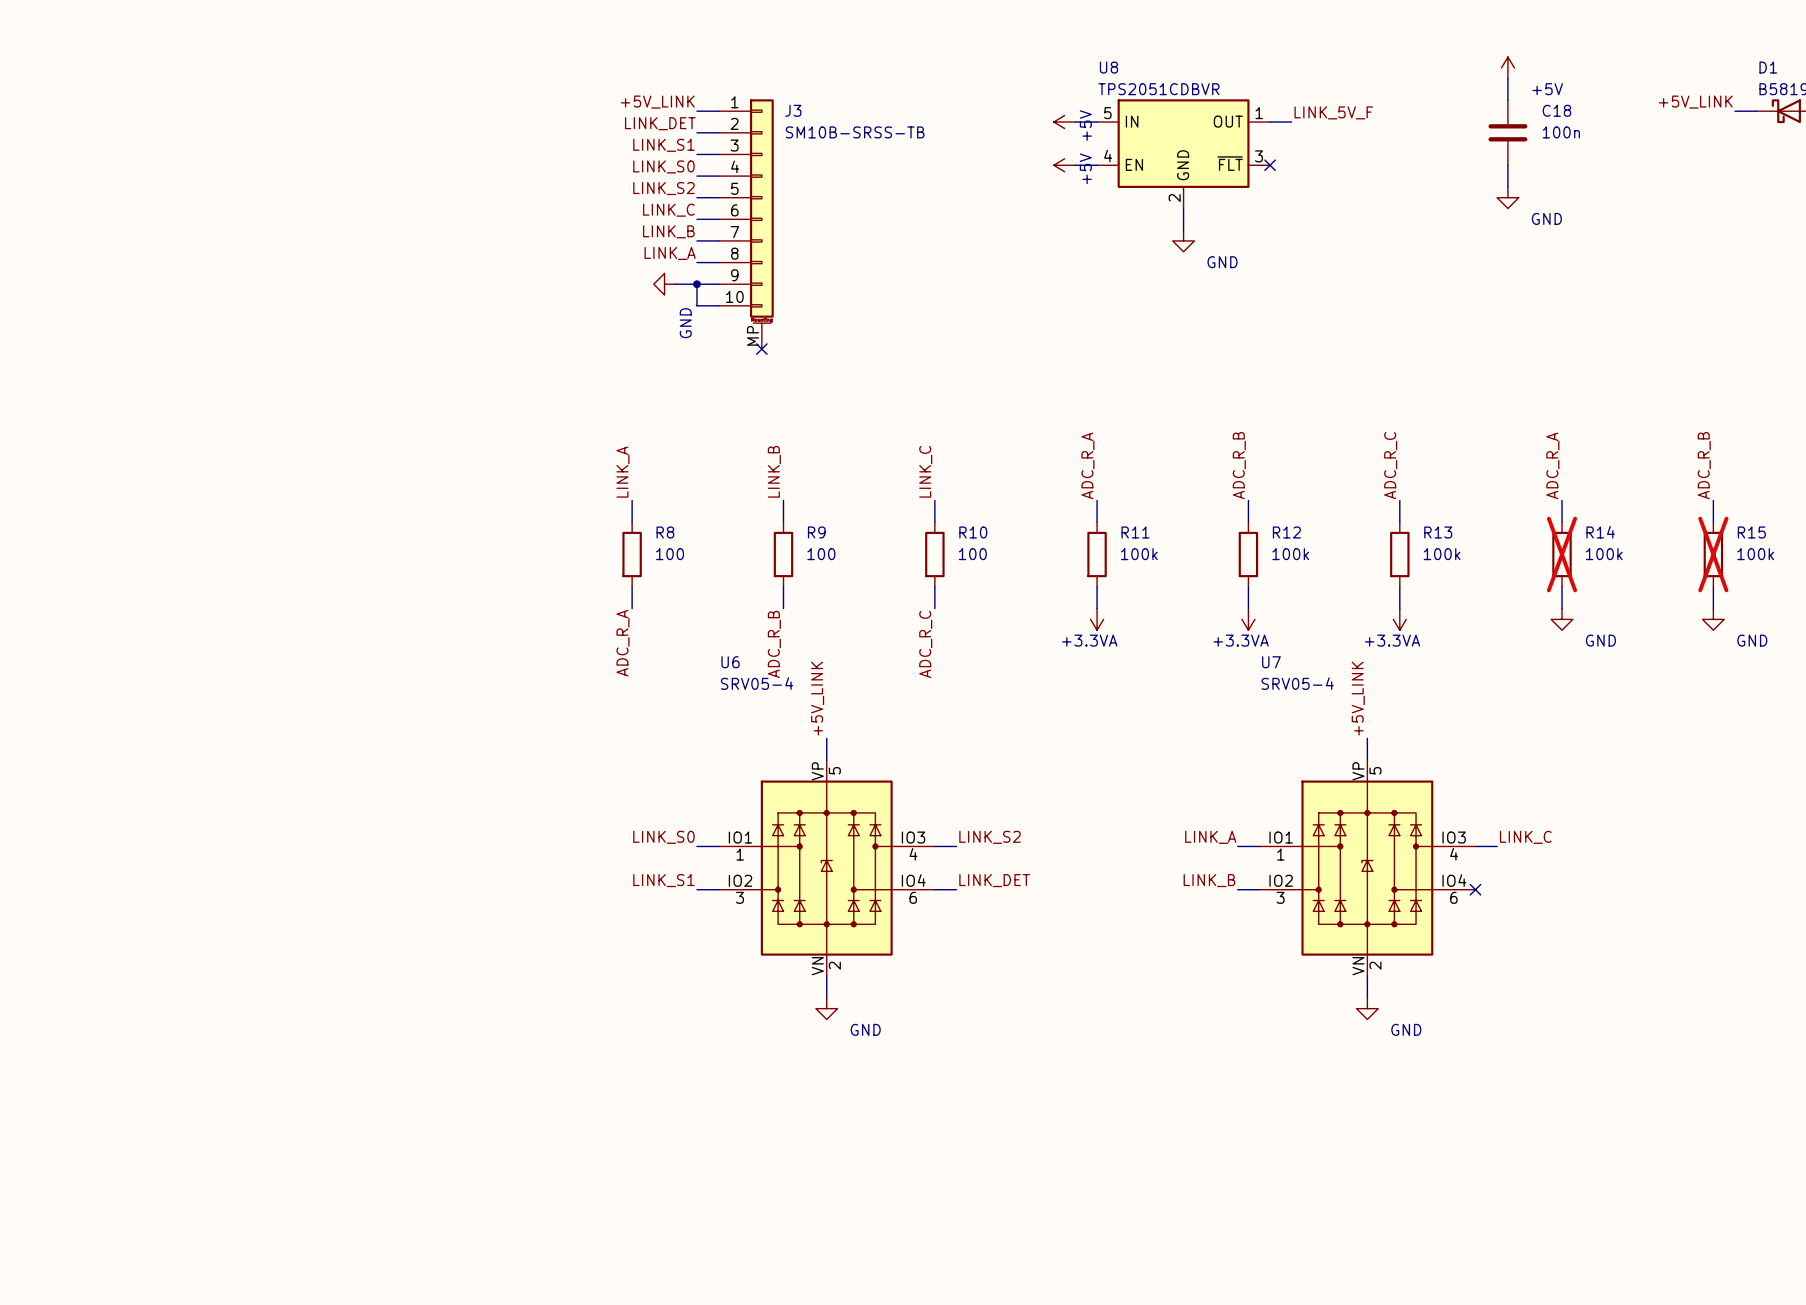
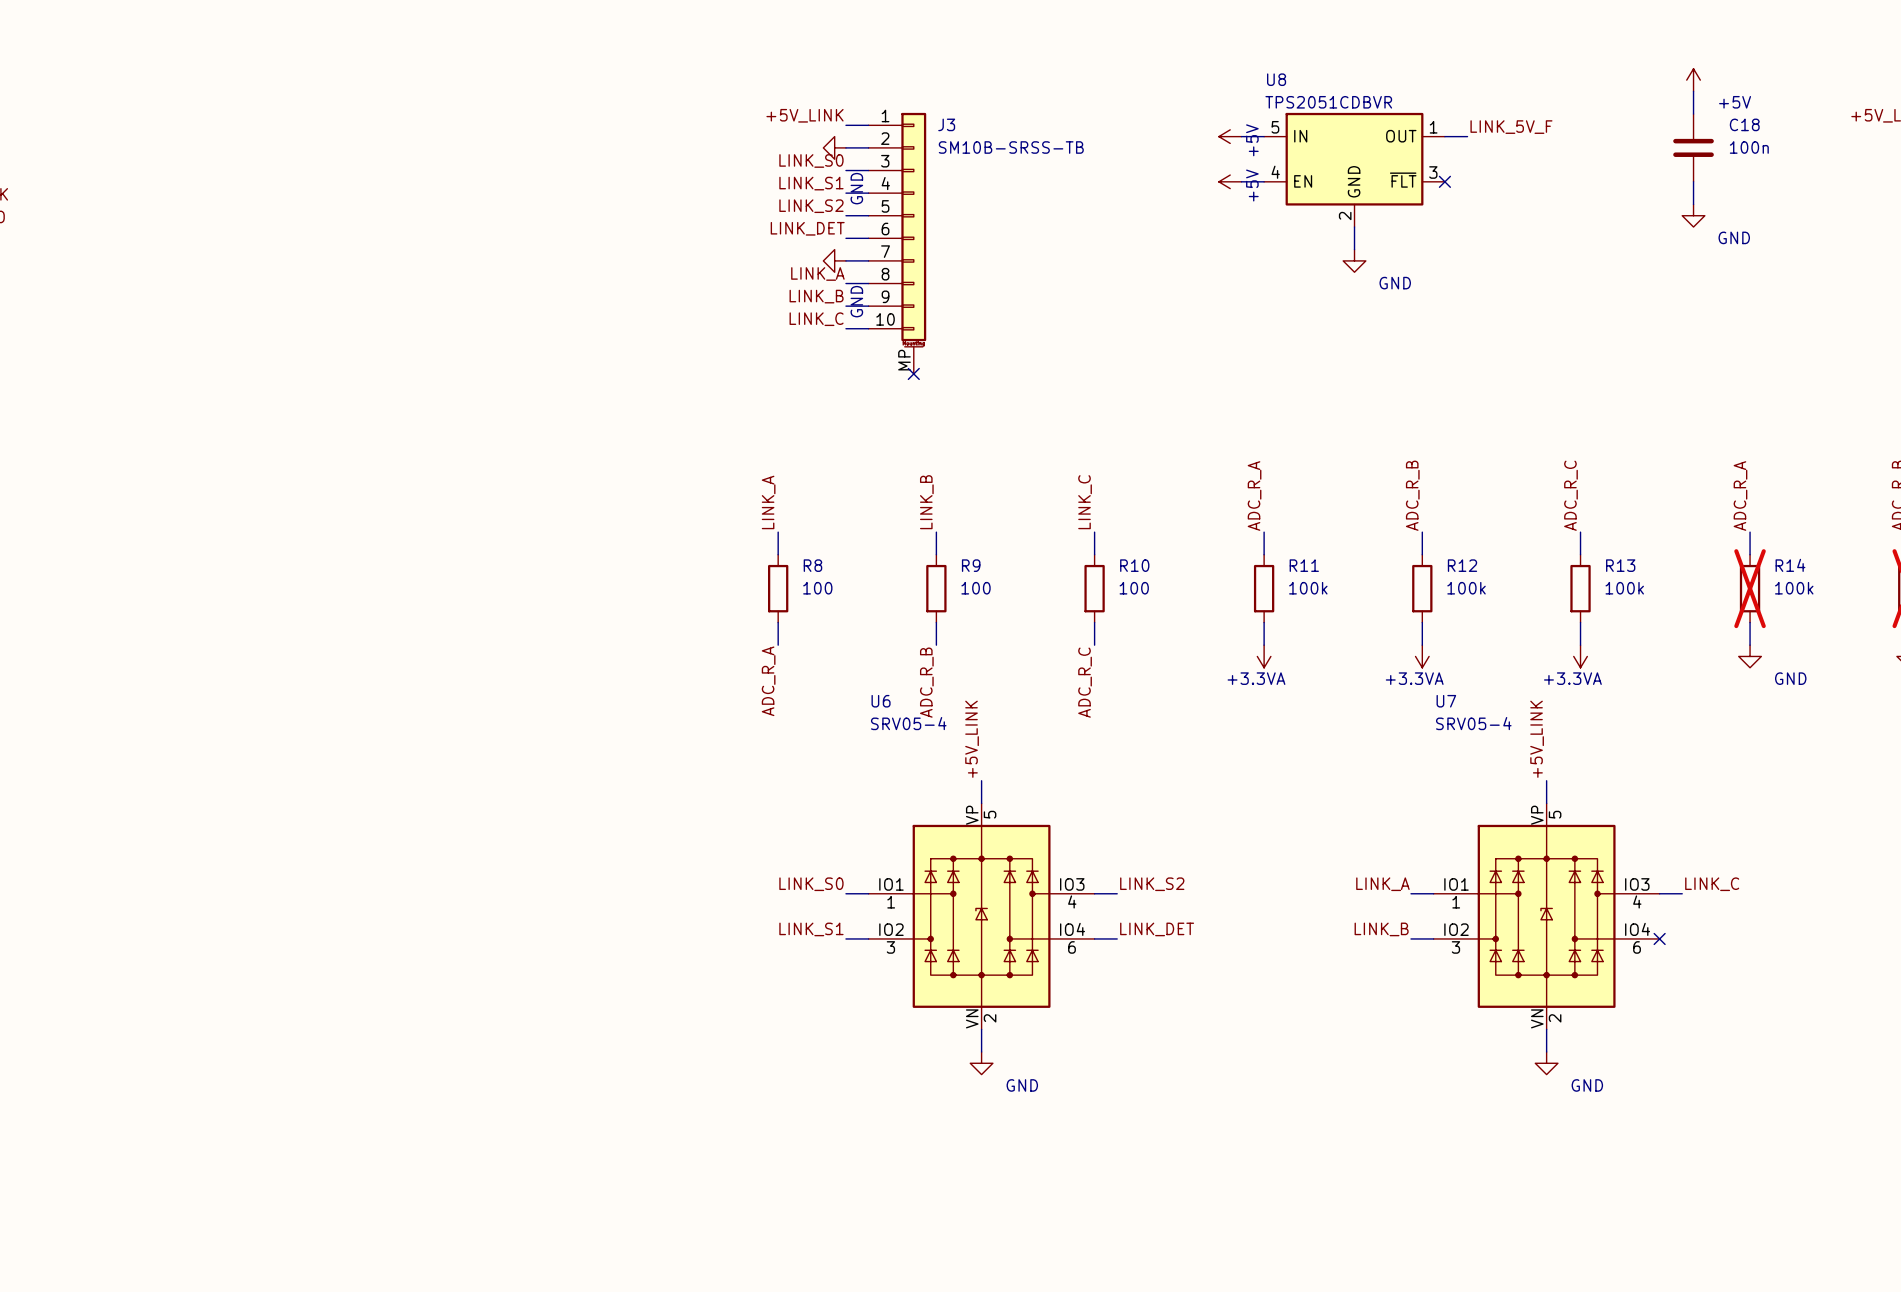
label: LINK_DET (660, 123) -> none
power symbol: none -> GND (834, 147)
label: LINK_S1 (663, 145) -> LINK_S0 (811, 160)
label: LINK_S0 (663, 166) -> LINK_S1 (811, 183)
label: LINK_C (668, 210) -> LINK_DET (807, 228)
label position: LINK_B (668, 231) -> LINK_B (816, 296)
power symbol position: GND (664, 284) -> GND (834, 260)
wire: (675, 284) (696, 284) (696, 305) -> none
junction: (696, 284) -> none
label: none -> LINK_C (816, 319)

